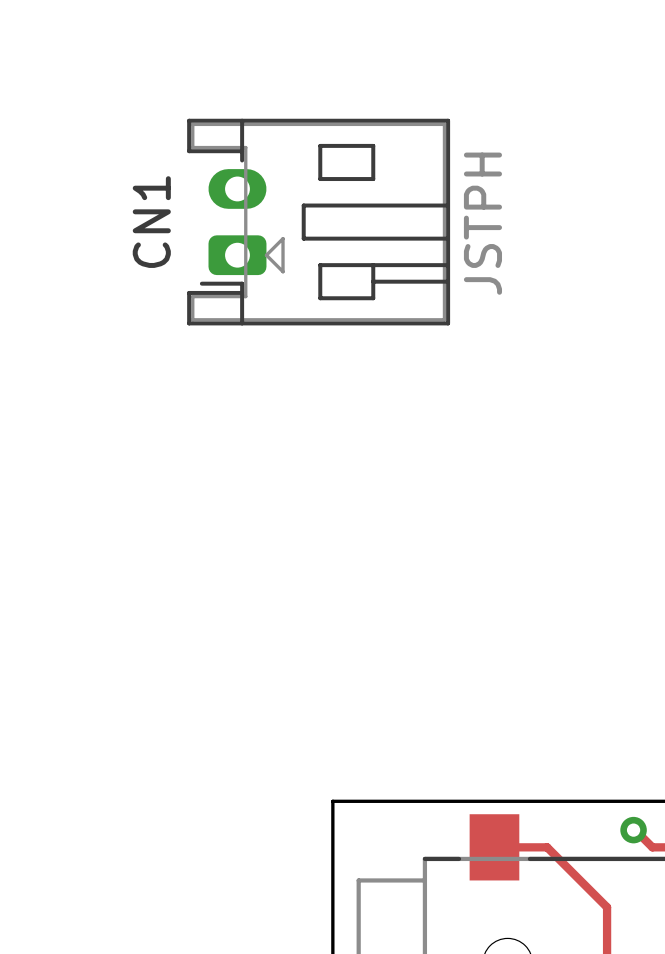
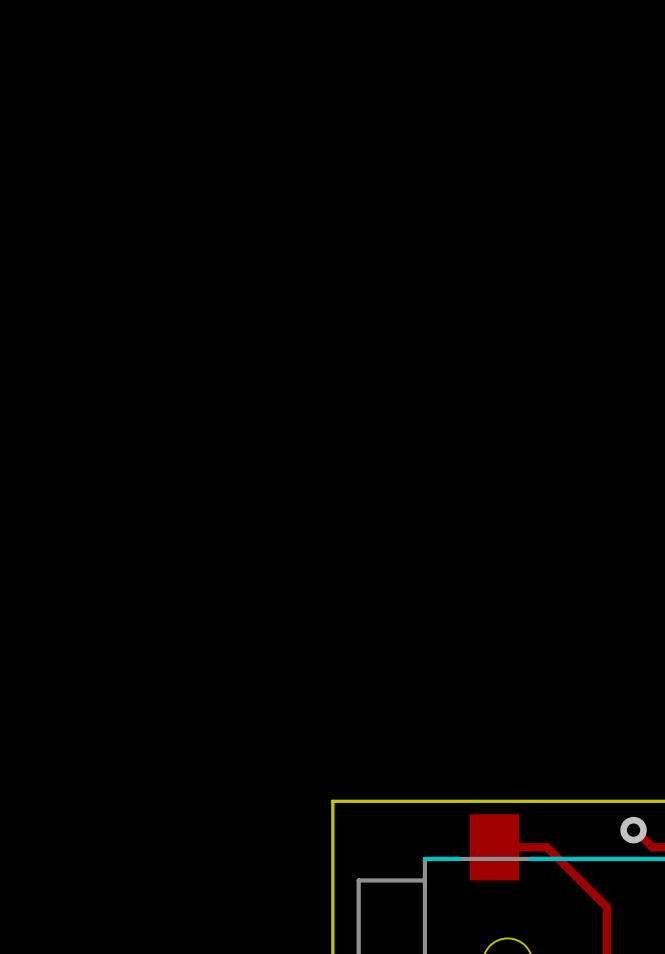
CN1: JSTPH (318, 222) -> none

